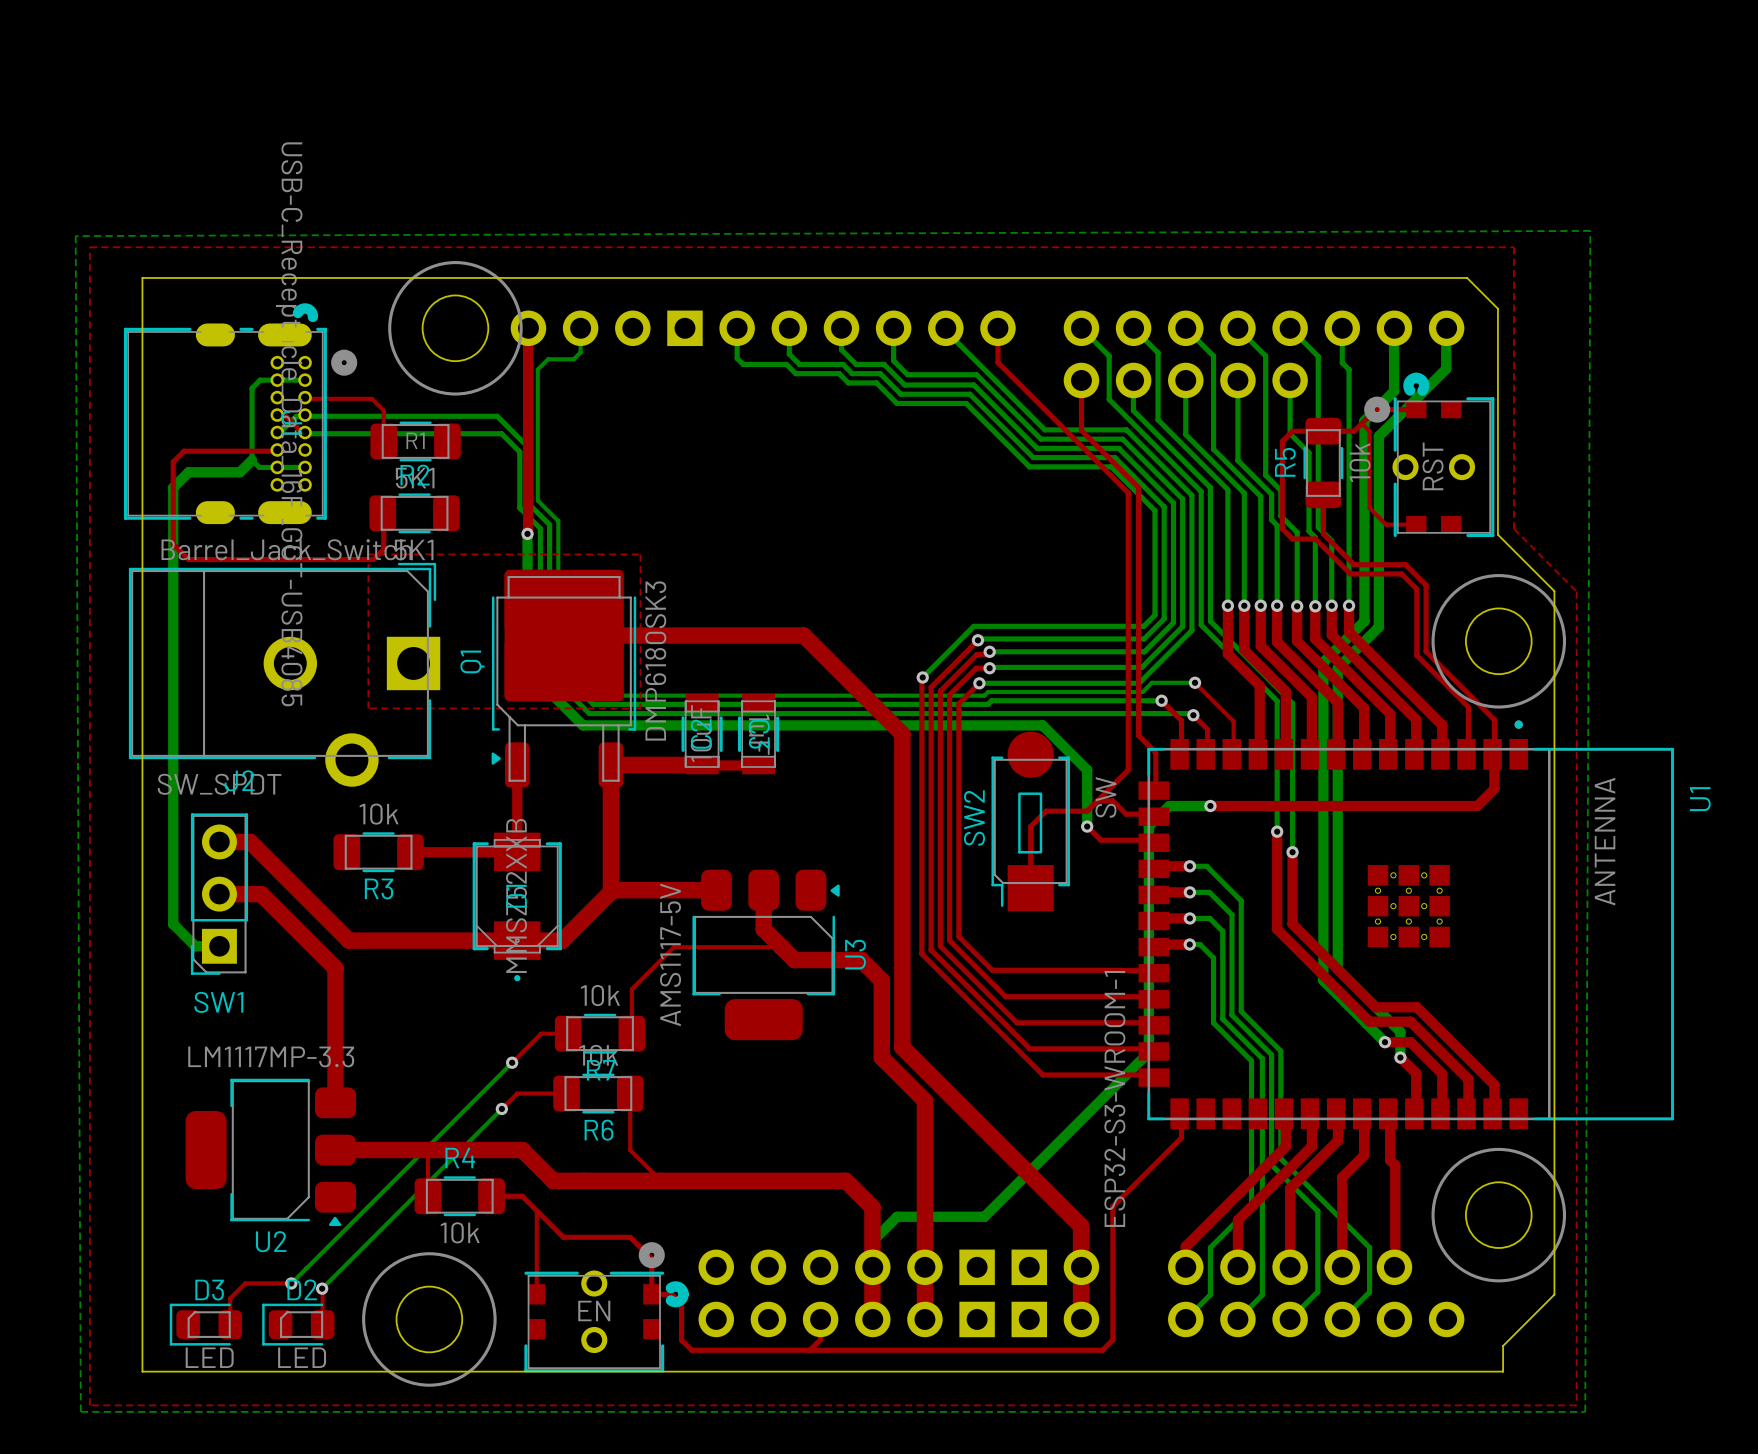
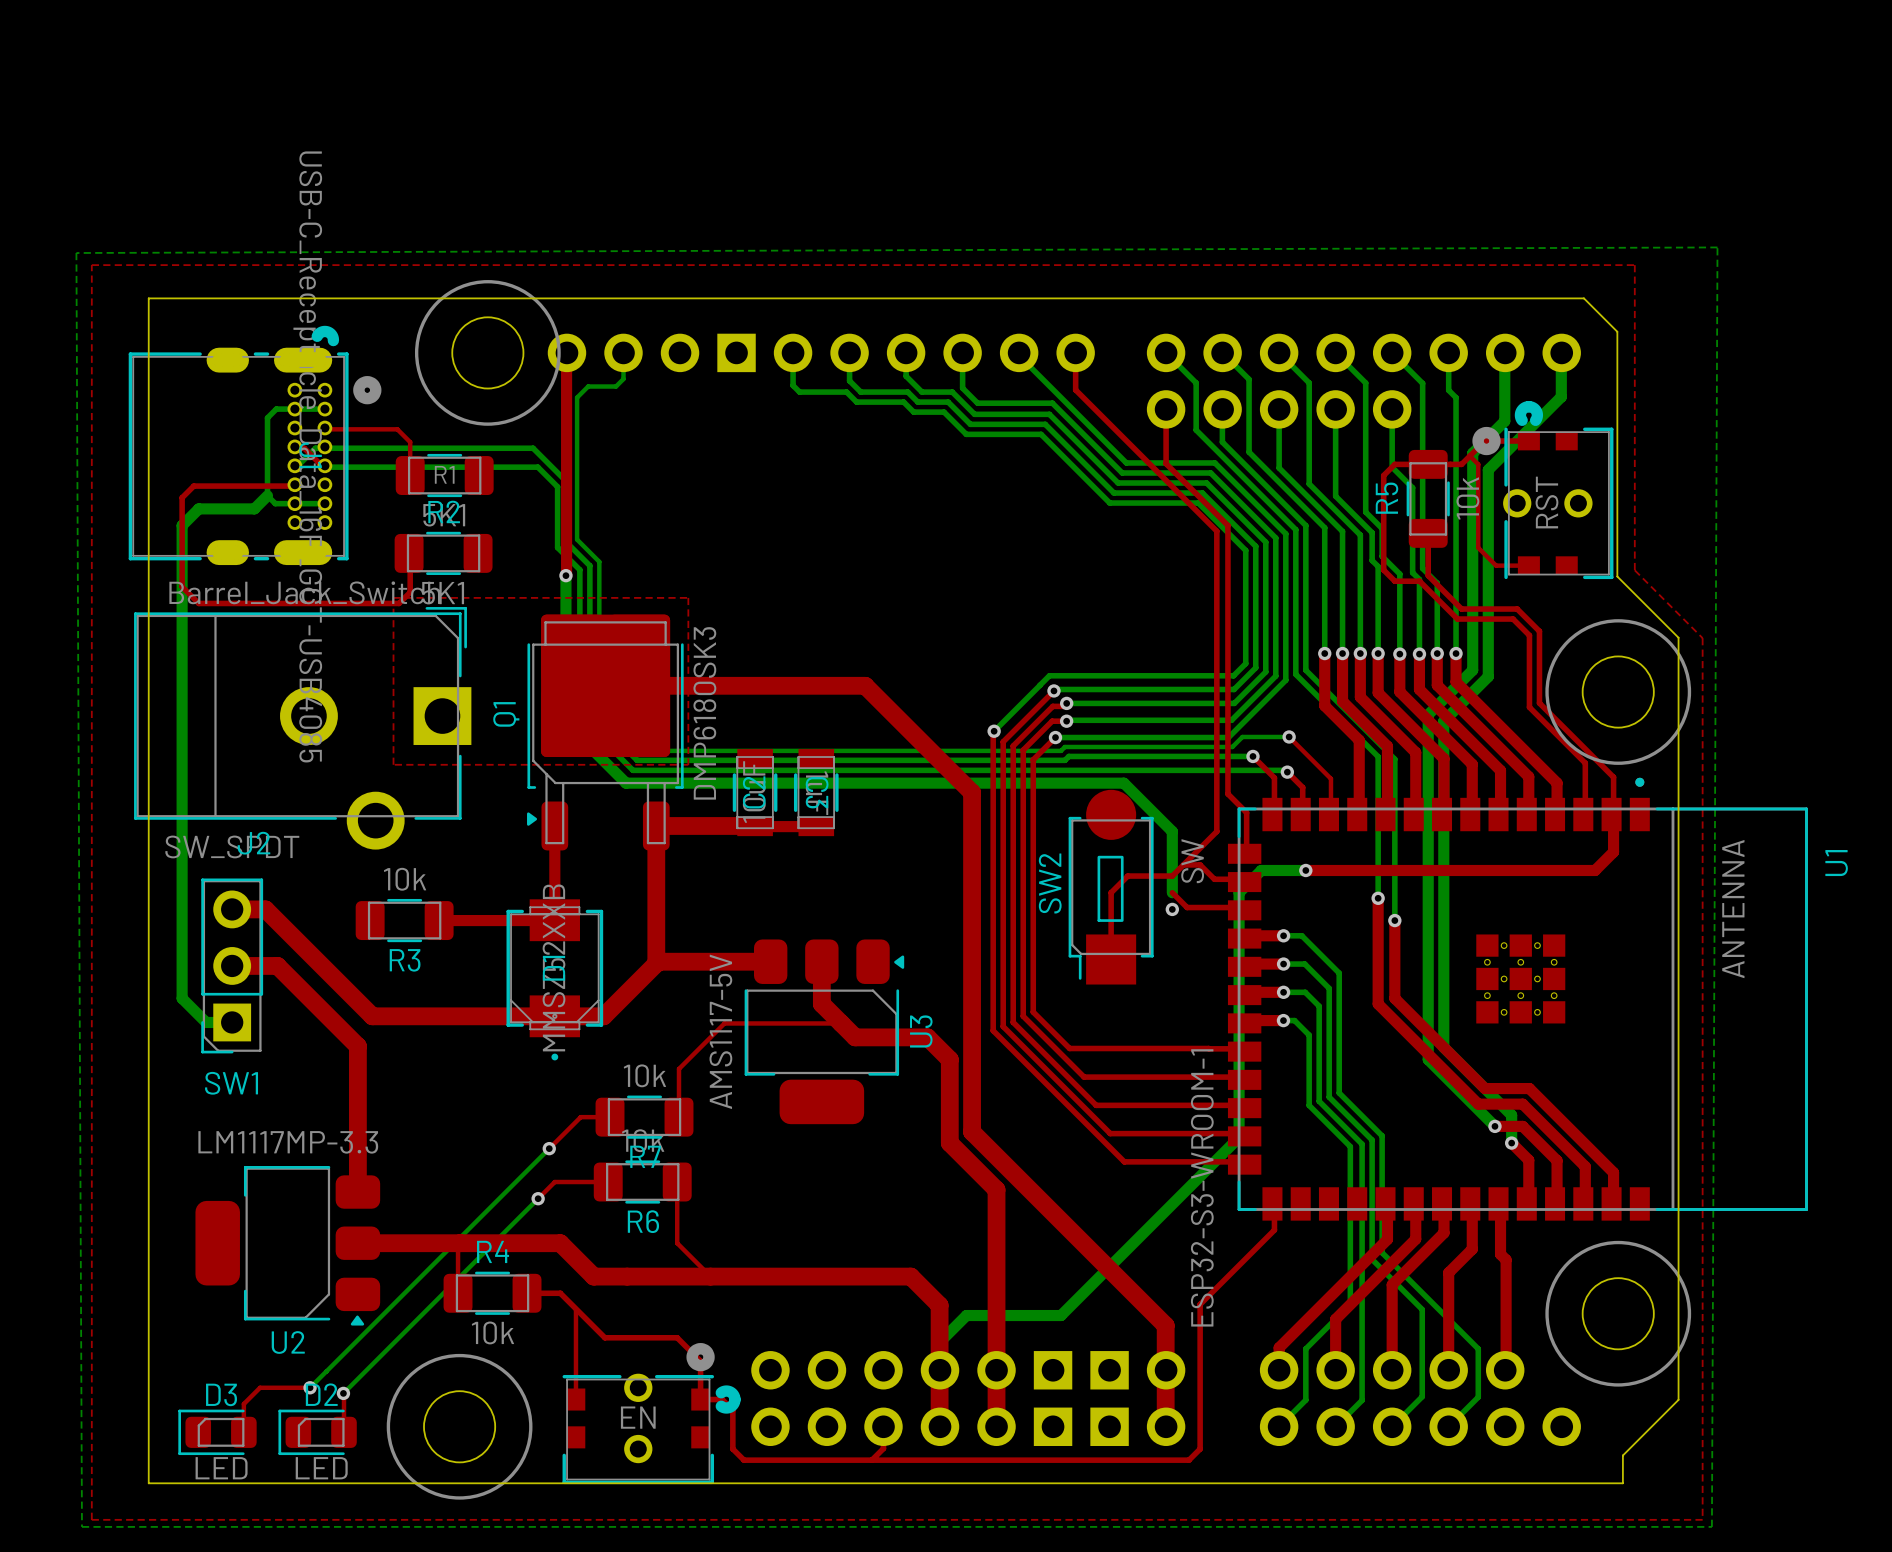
via position: (1087, 826) -> (1172, 909)

